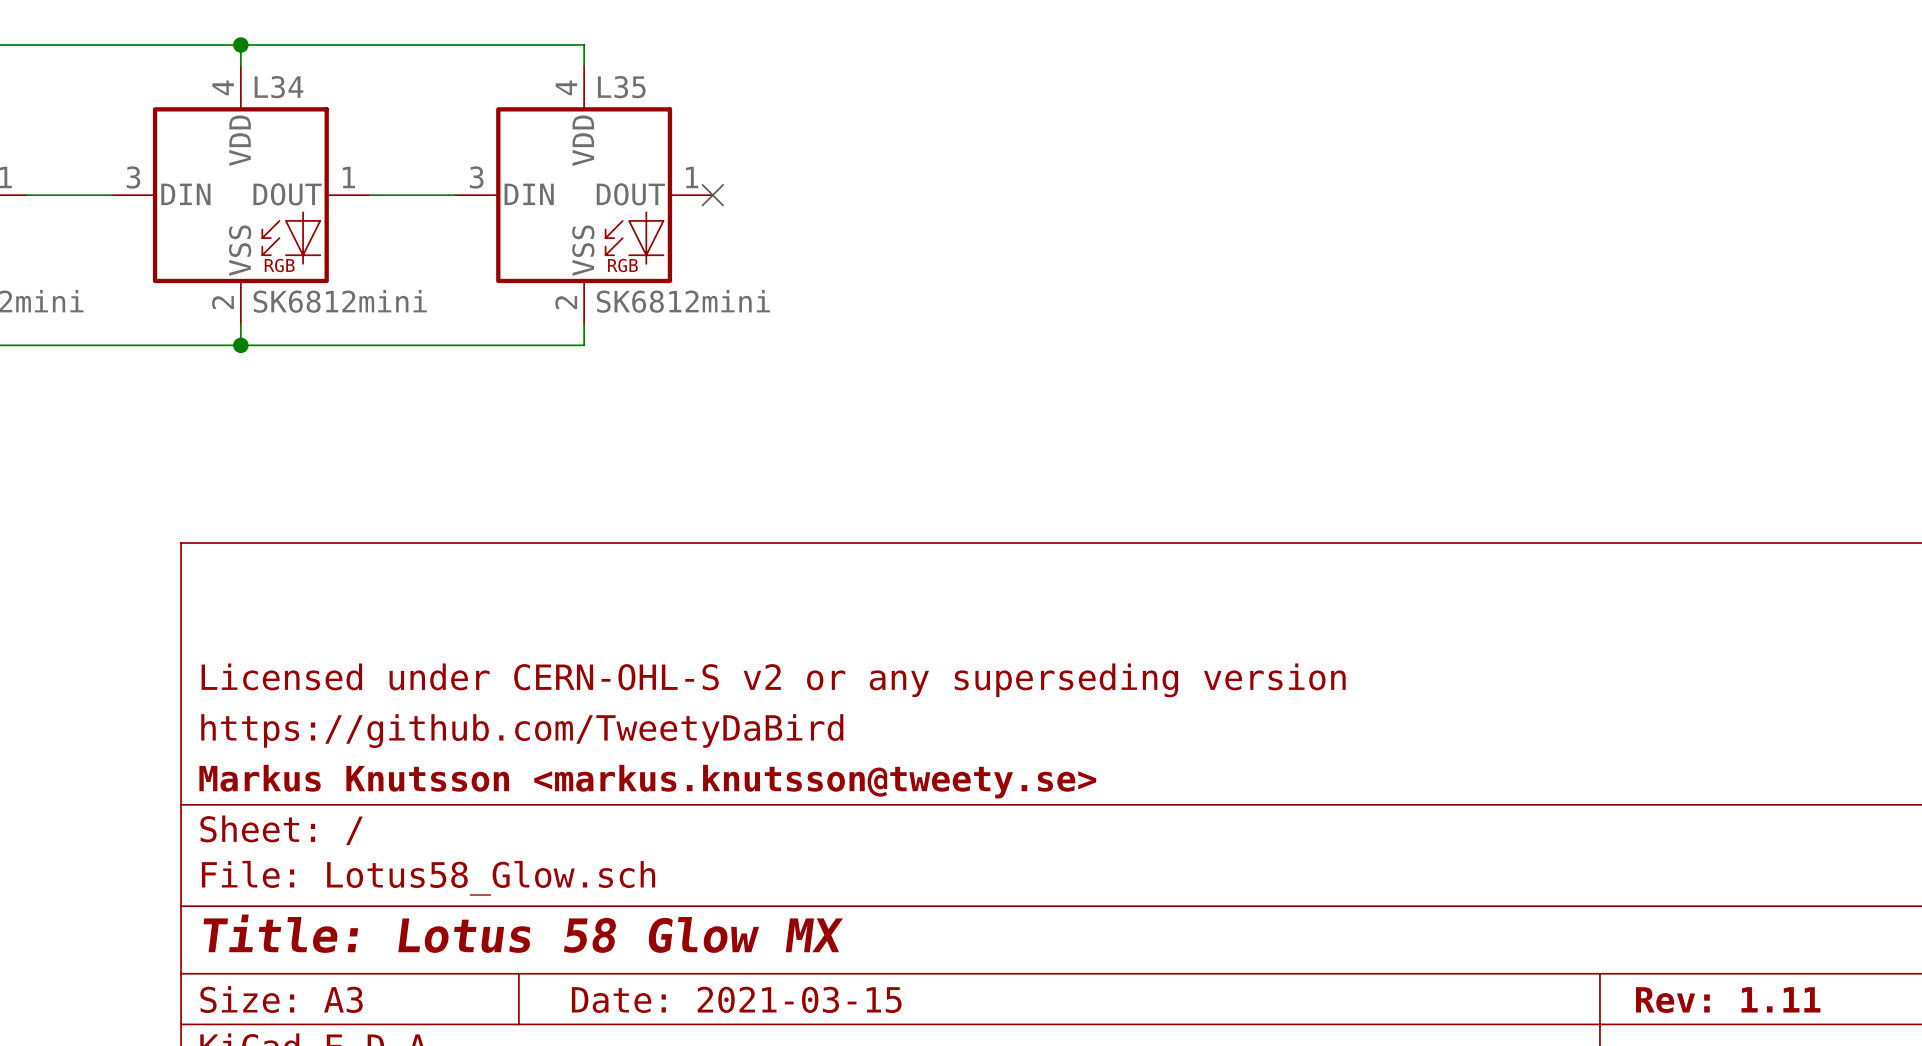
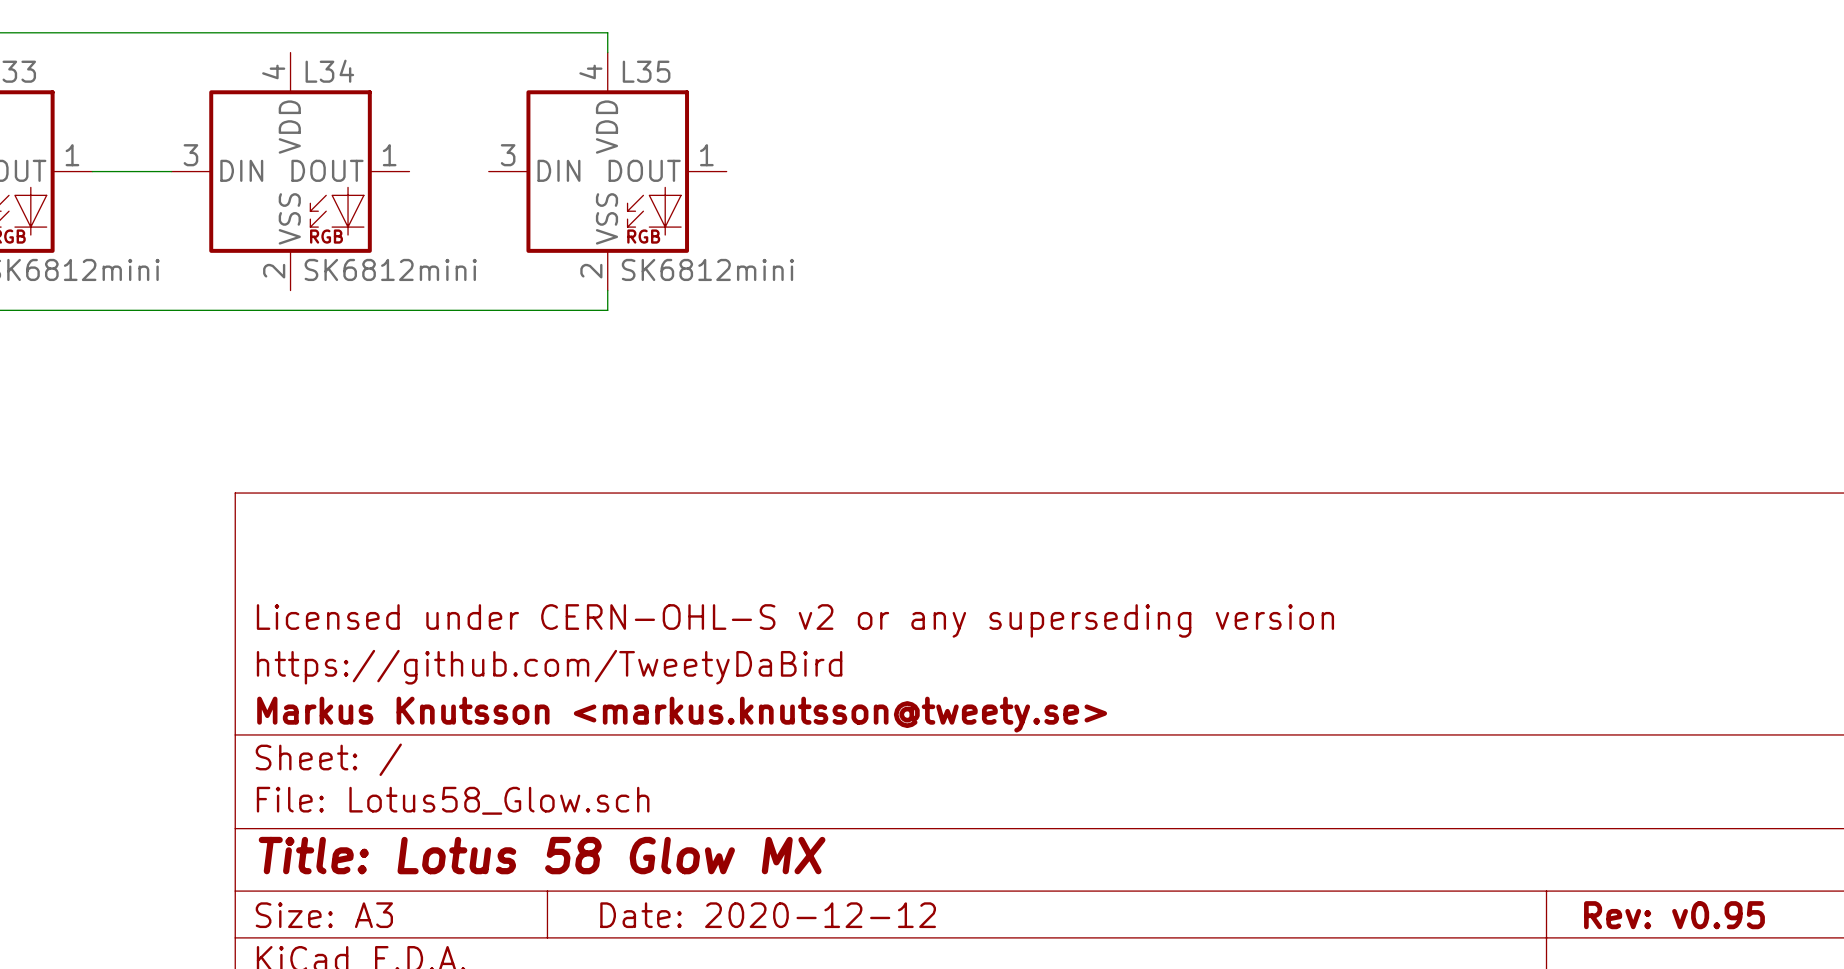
wire: (240, 45) (240, 66) -> none
junction: (240, 45) -> none
wire: (369, 195) (455, 195) -> none
no-connect mark: (712, 195) -> none
wire: (240, 323) (240, 345) -> none
junction: (240, 345) -> none
title block: Date: 2021-03-15 (736, 999) -> Date: 2020-12-12 (768, 915)
title block: Rev: 1.11 (1728, 1000) -> Rev: v0.95 (1674, 915)

